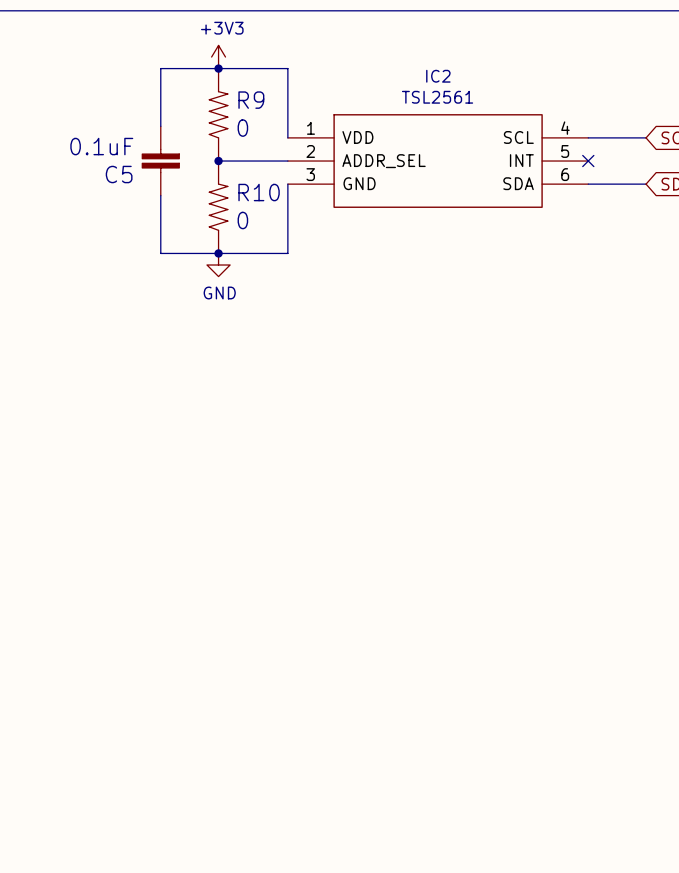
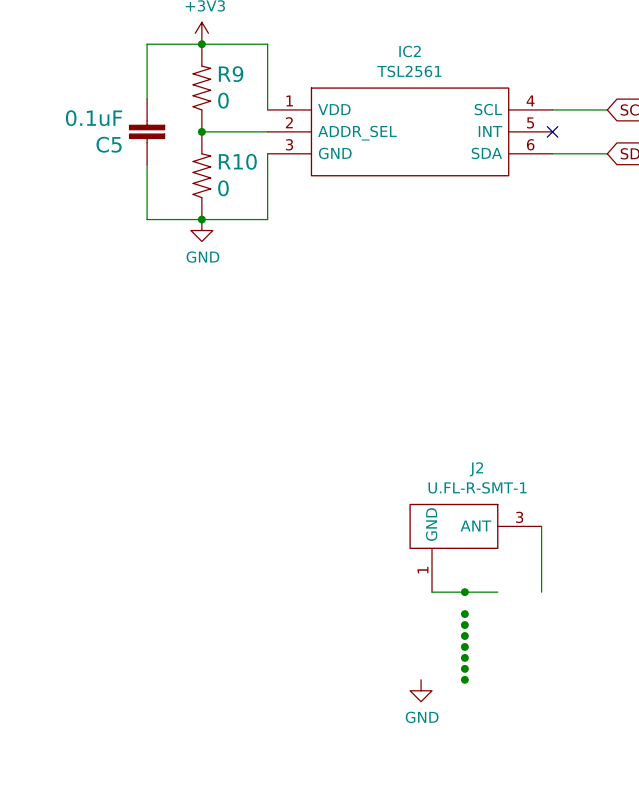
wire: none -> (541, 526) (541, 592)
J2: none -> U.FL-R-SMT-1 (475, 547)
wire: none -> (432, 592) (497, 592)
junction: none -> (464, 592)
junction: none -> (464, 614)
junction: none -> (464, 625)
junction: none -> (464, 635)
junction: none -> (464, 646)
junction: none -> (464, 657)
junction: none -> (464, 668)
junction: none -> (464, 679)
power symbol: none -> GND (421, 690)

